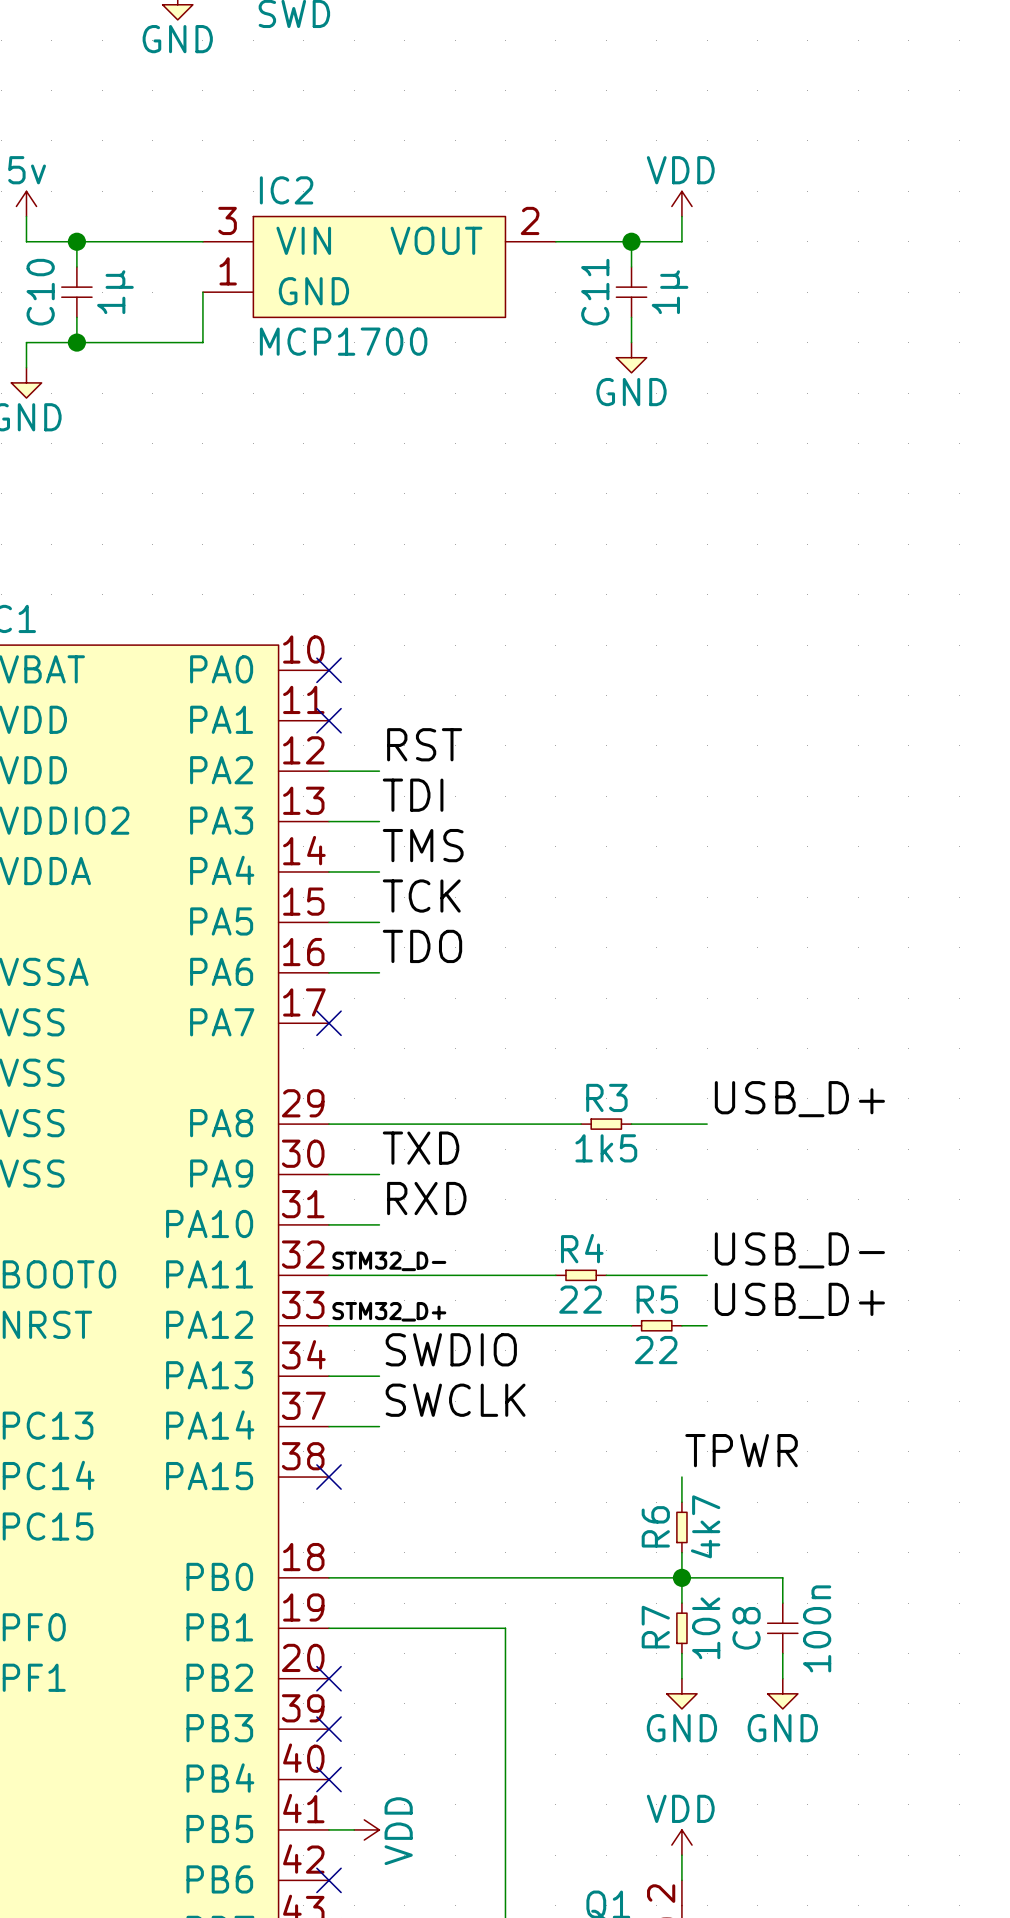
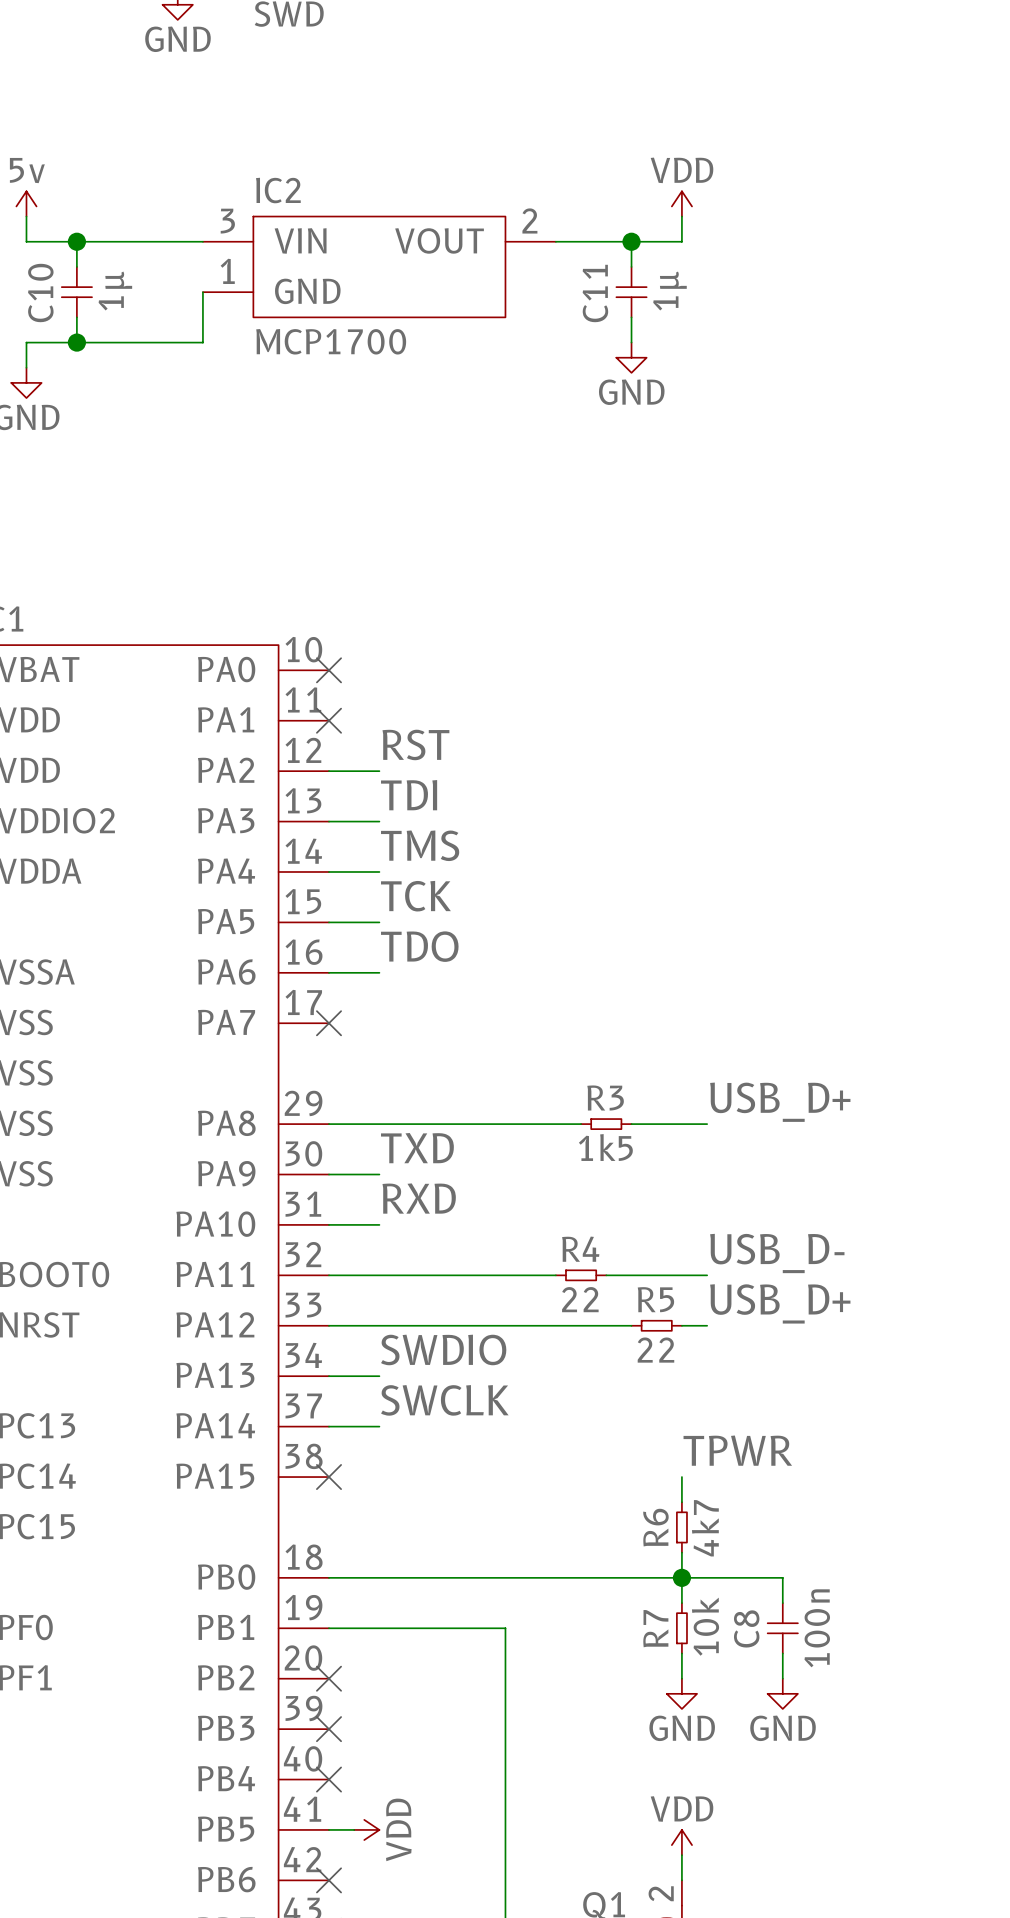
label: STM32_D- (389, 1261) -> none
label: STM32_D+ (389, 1311) -> none

